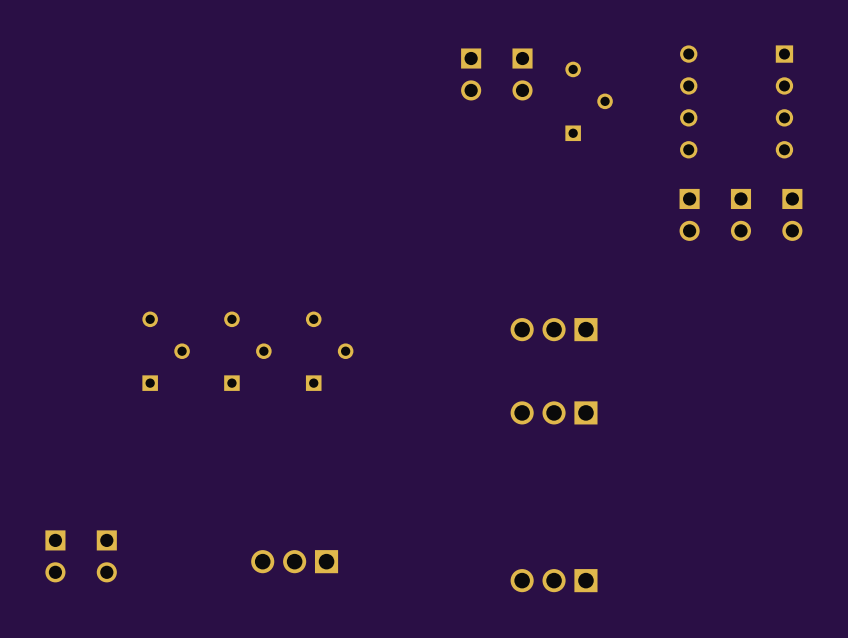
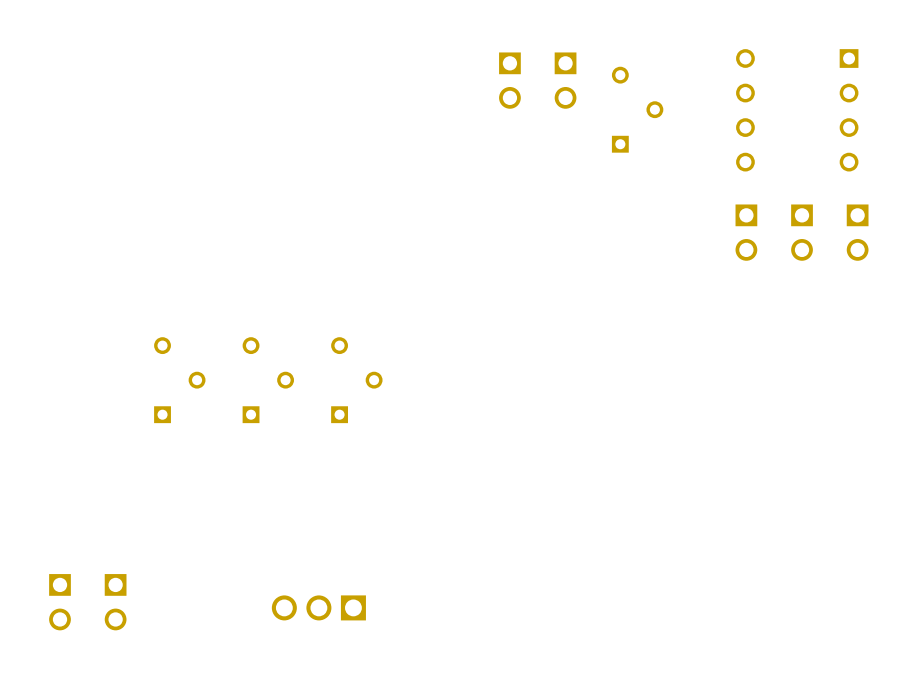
part: (554, 329) -> none
part: (554, 412) -> none
part: (554, 580) -> none

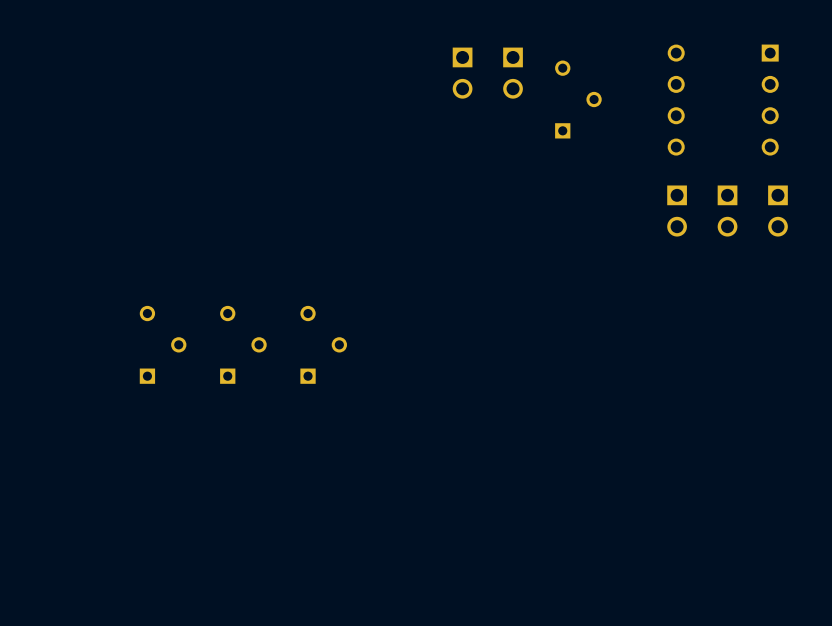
part: (60, 602) -> none
part: (115, 602) -> none
part: (318, 607) -> none

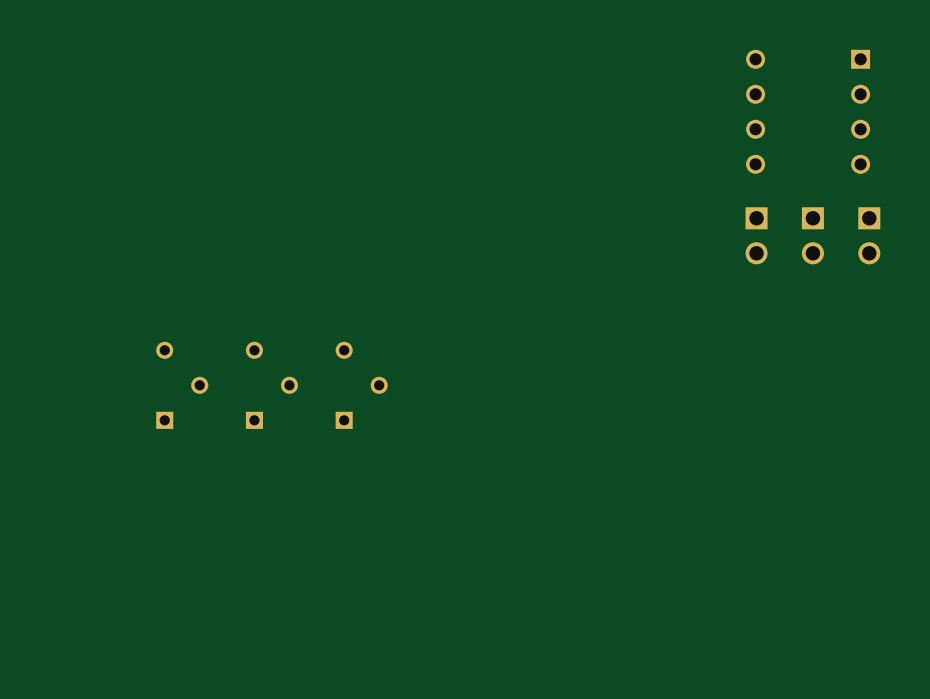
part: (462, 73) -> none
part: (513, 73) -> none
part: (578, 99) -> none

